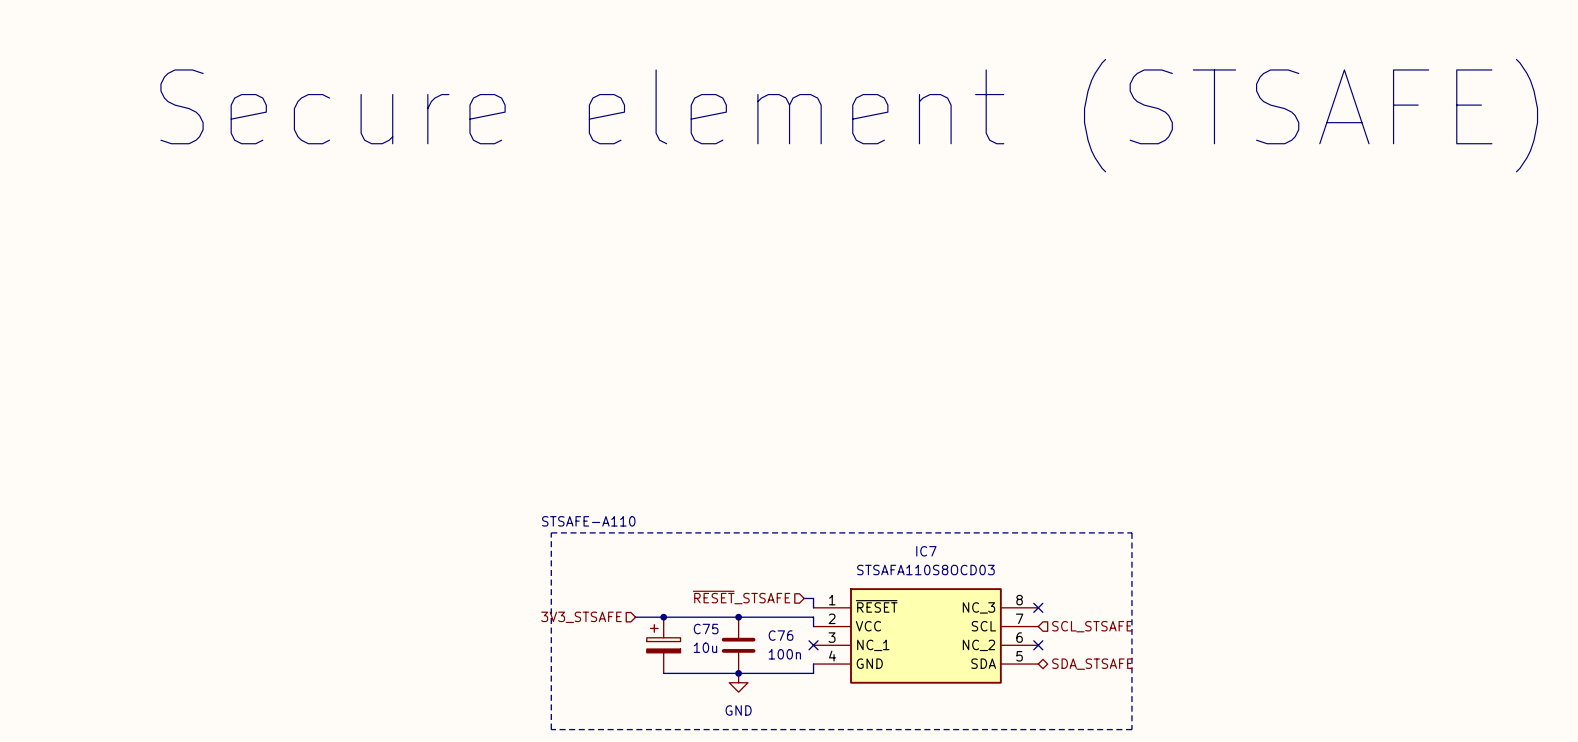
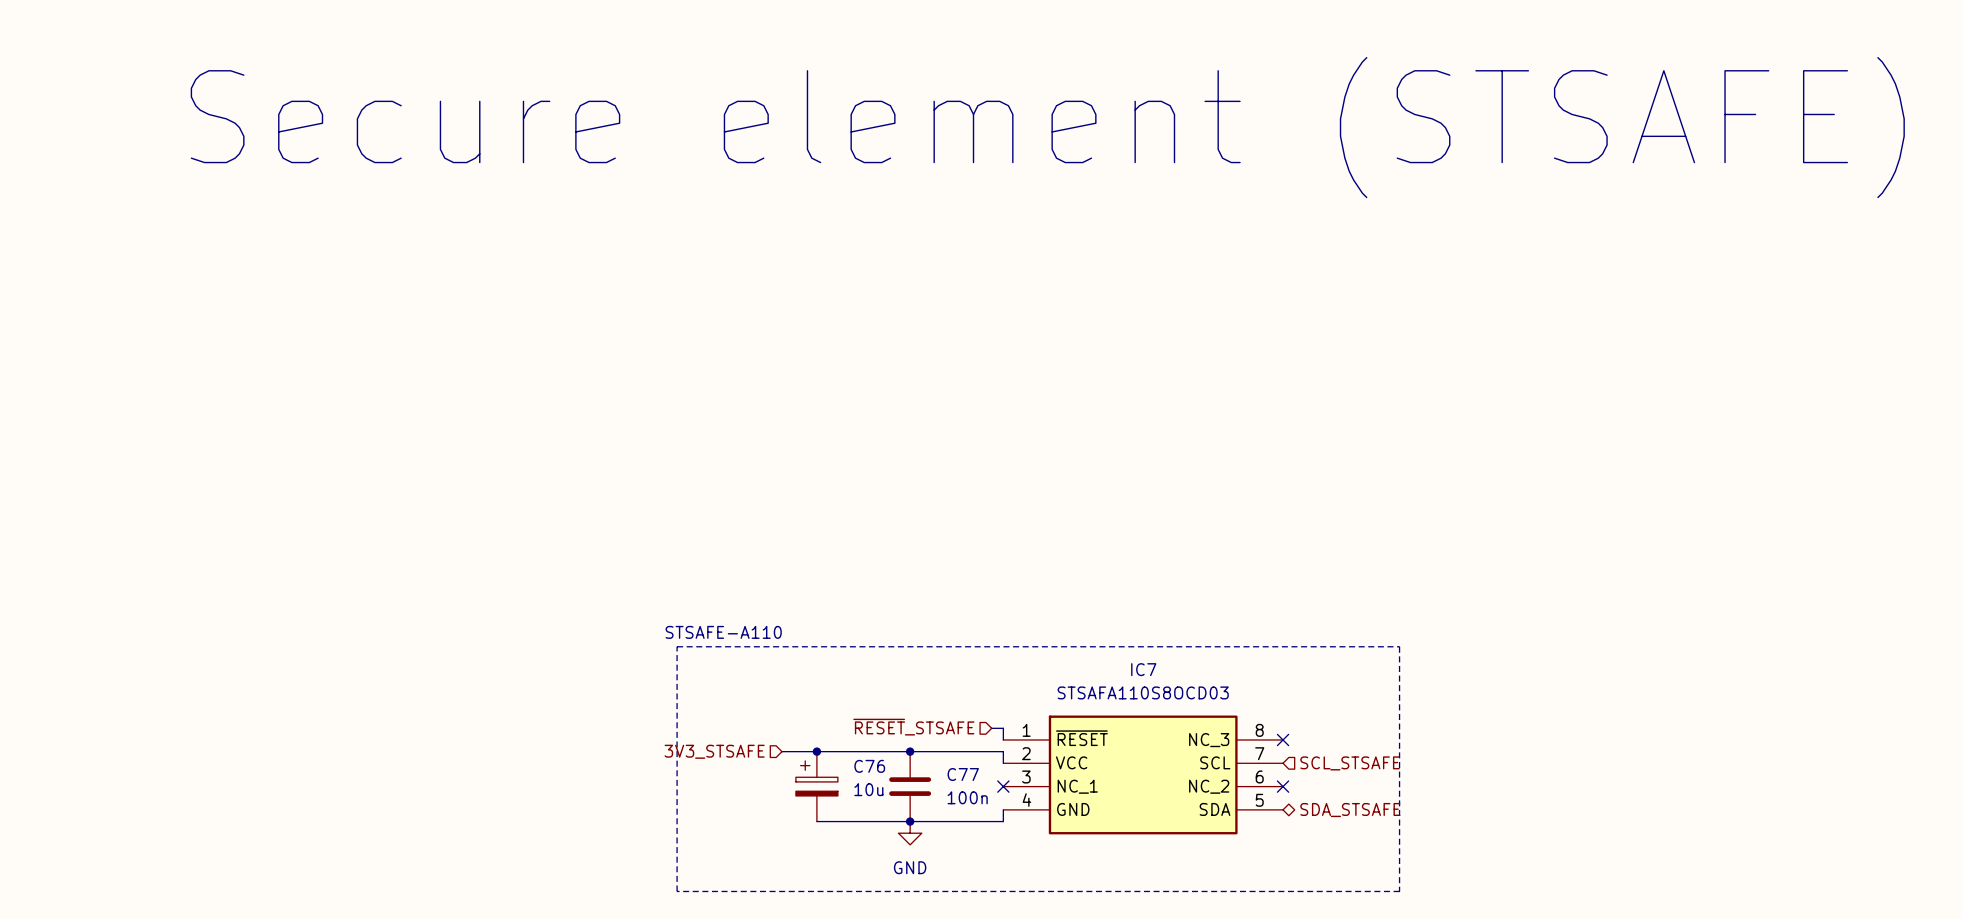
C75 name: C75 (706, 629) -> C76 (869, 766)
C76 name: C76 (781, 635) -> C77 (963, 774)

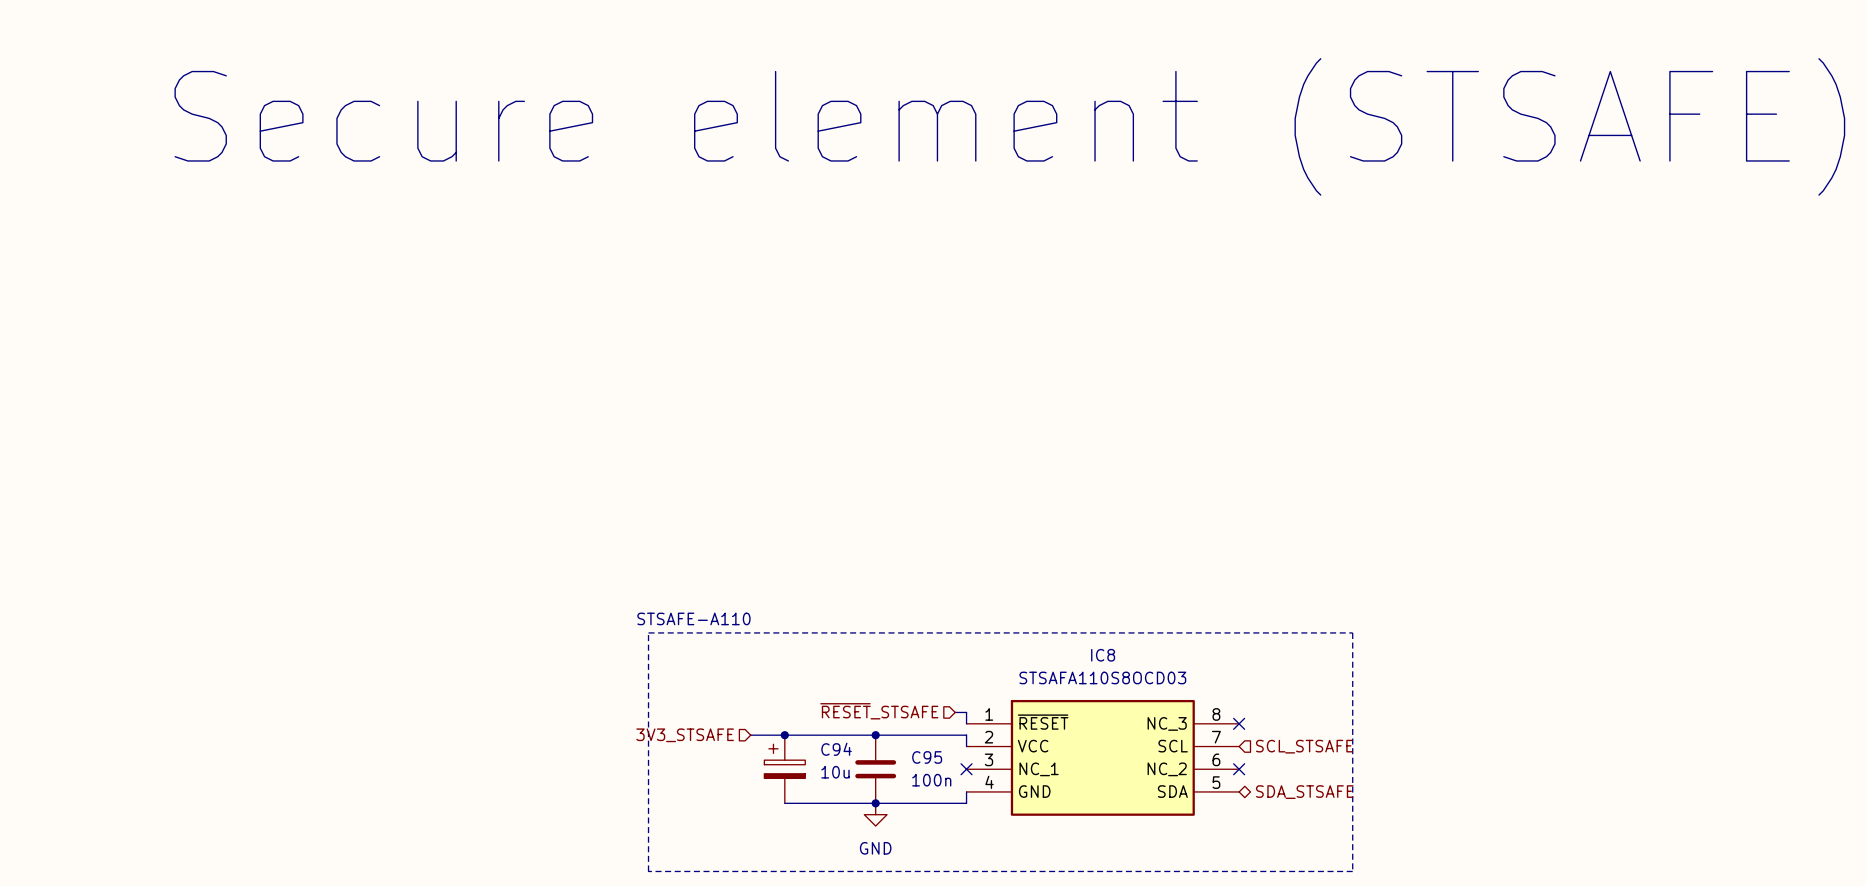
IC7 name: IC7 (1143, 669) -> IC8 (1103, 655)
C76 name: C76 (869, 766) -> C94 (836, 749)
C77 name: C77 (963, 774) -> C95 (927, 757)

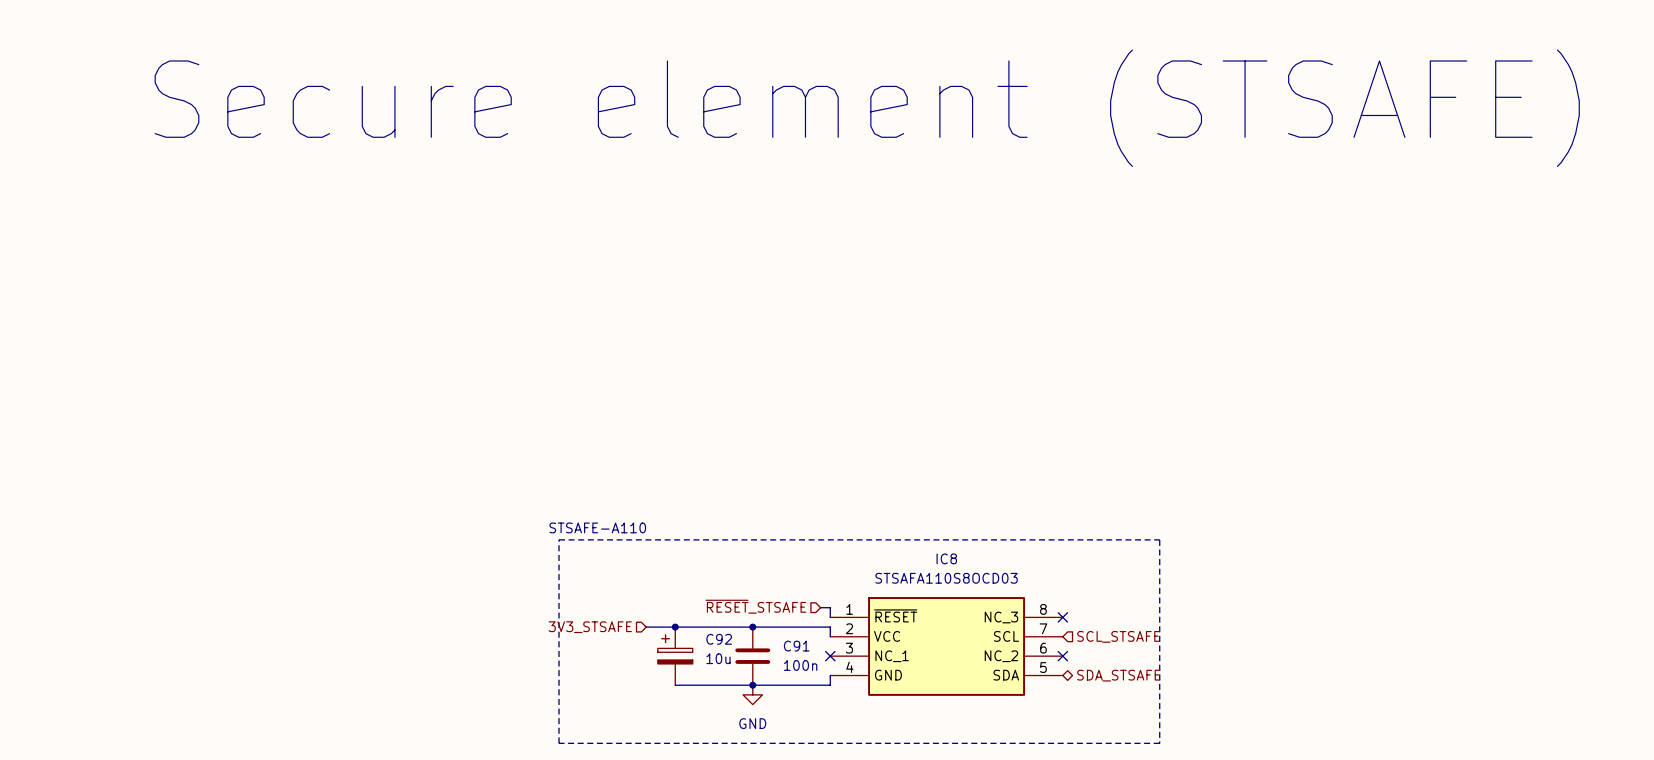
C94 name: C94 (836, 749) -> C92 (719, 639)
C95 name: C95 (927, 757) -> C91 (796, 646)

